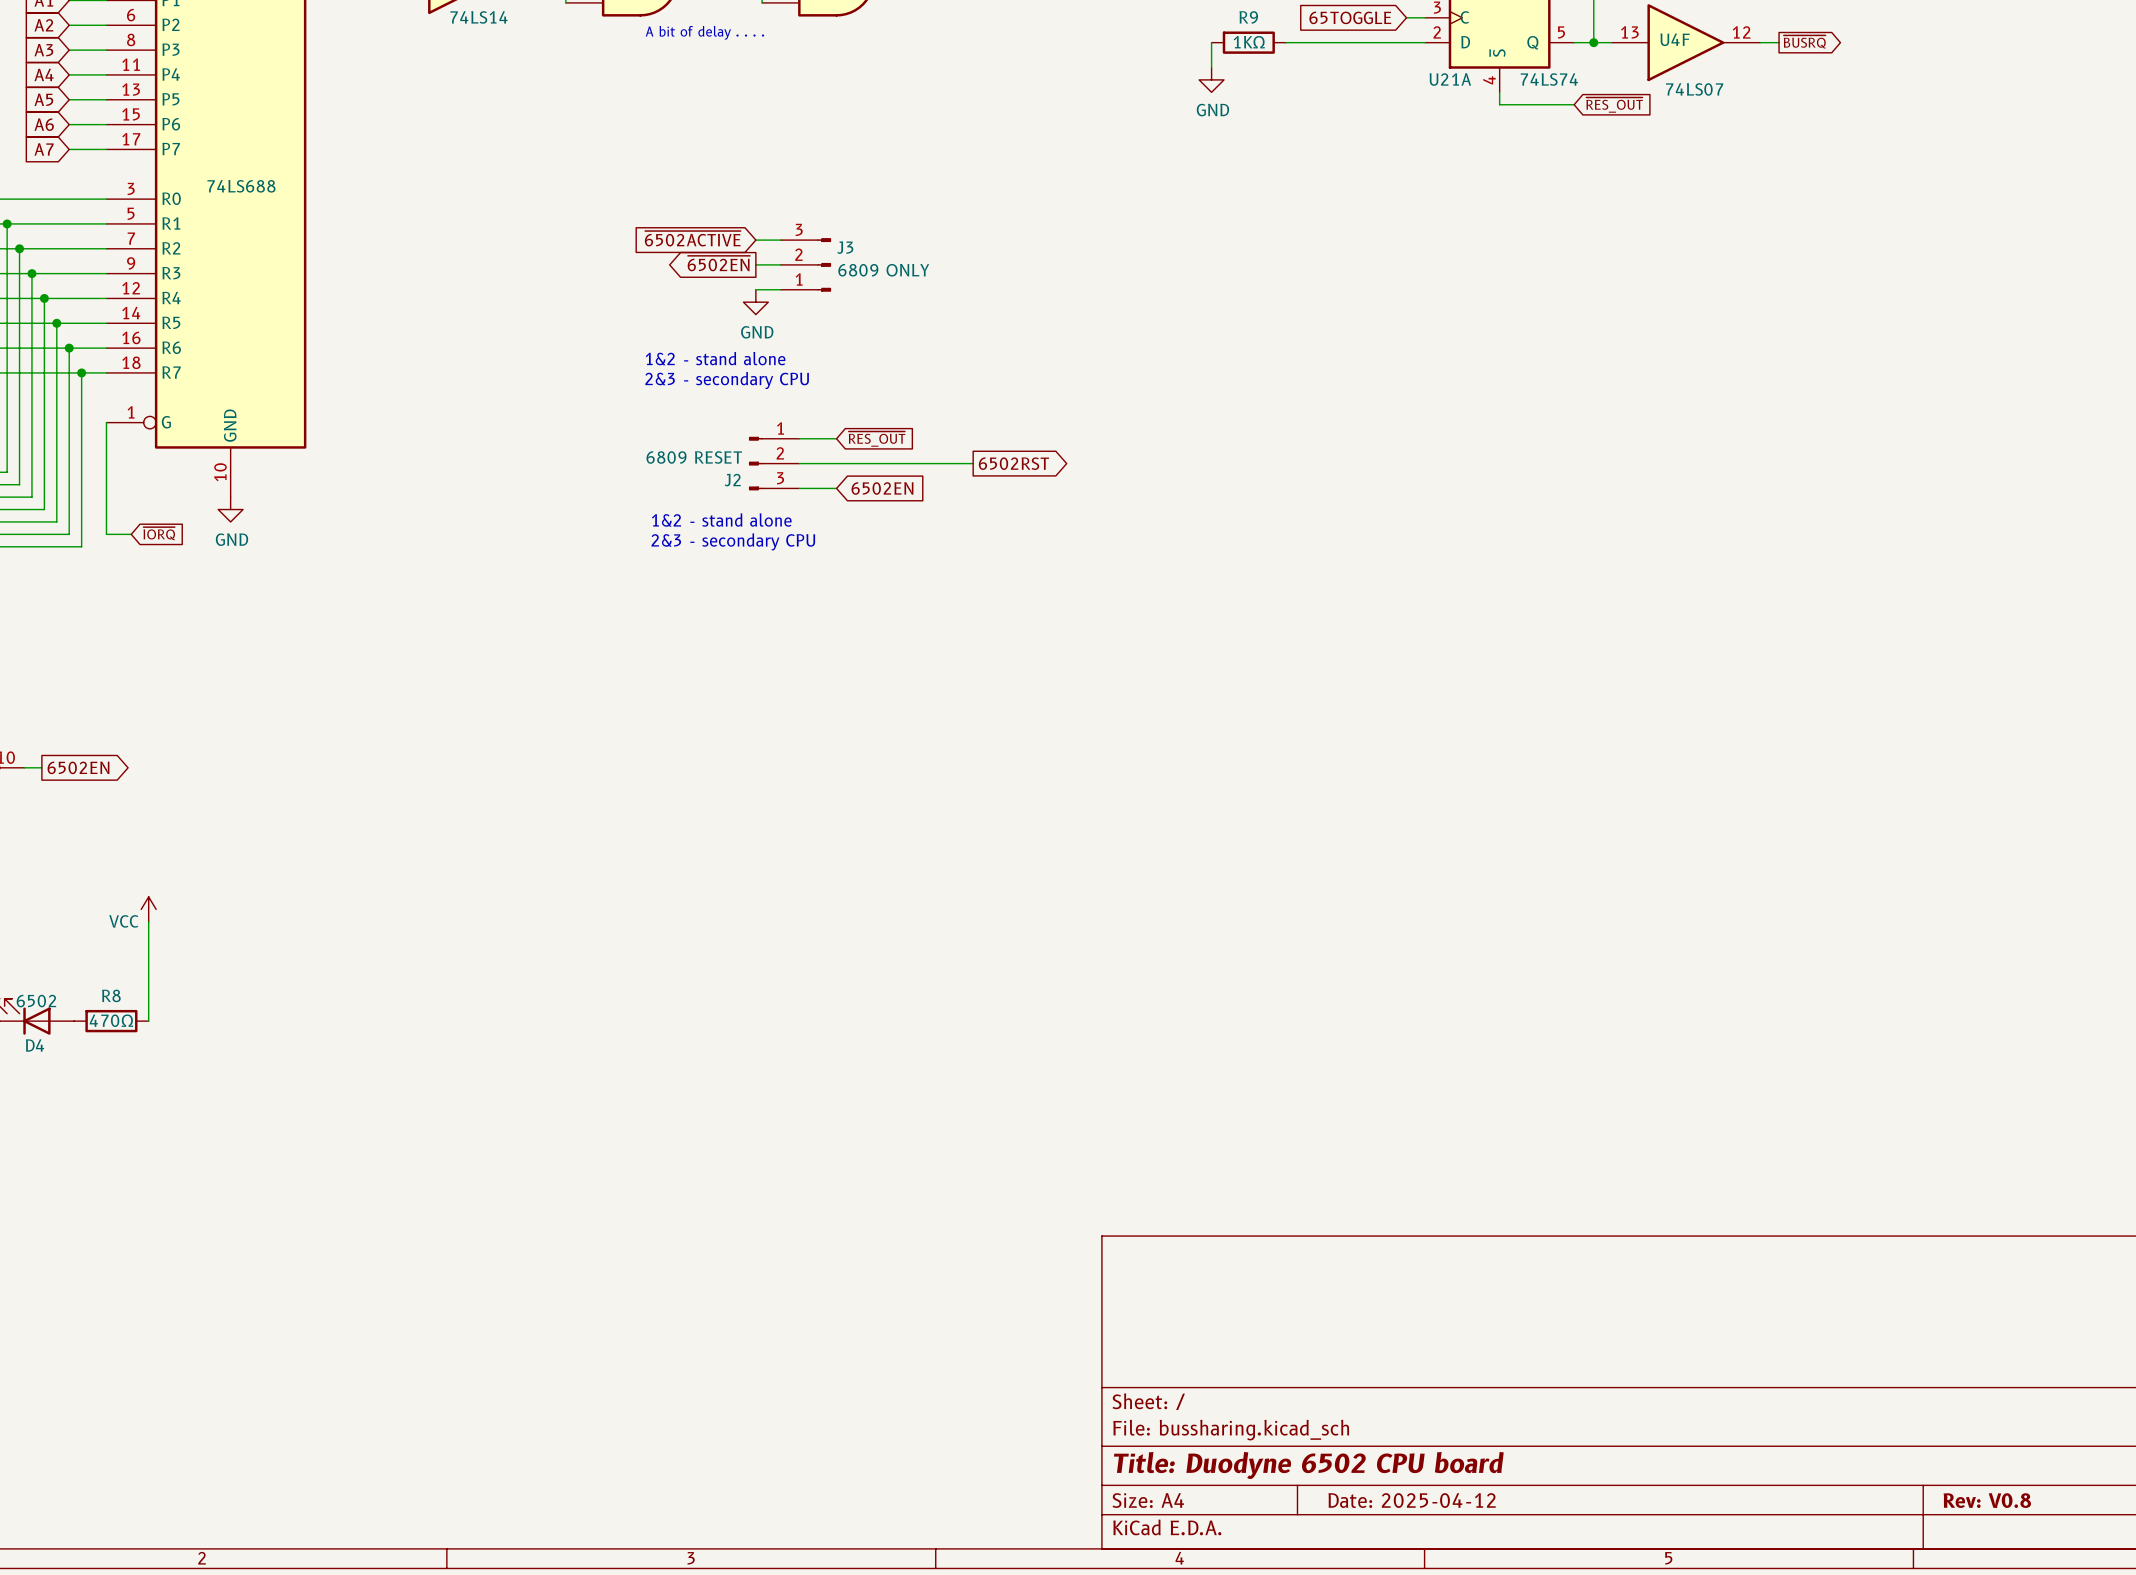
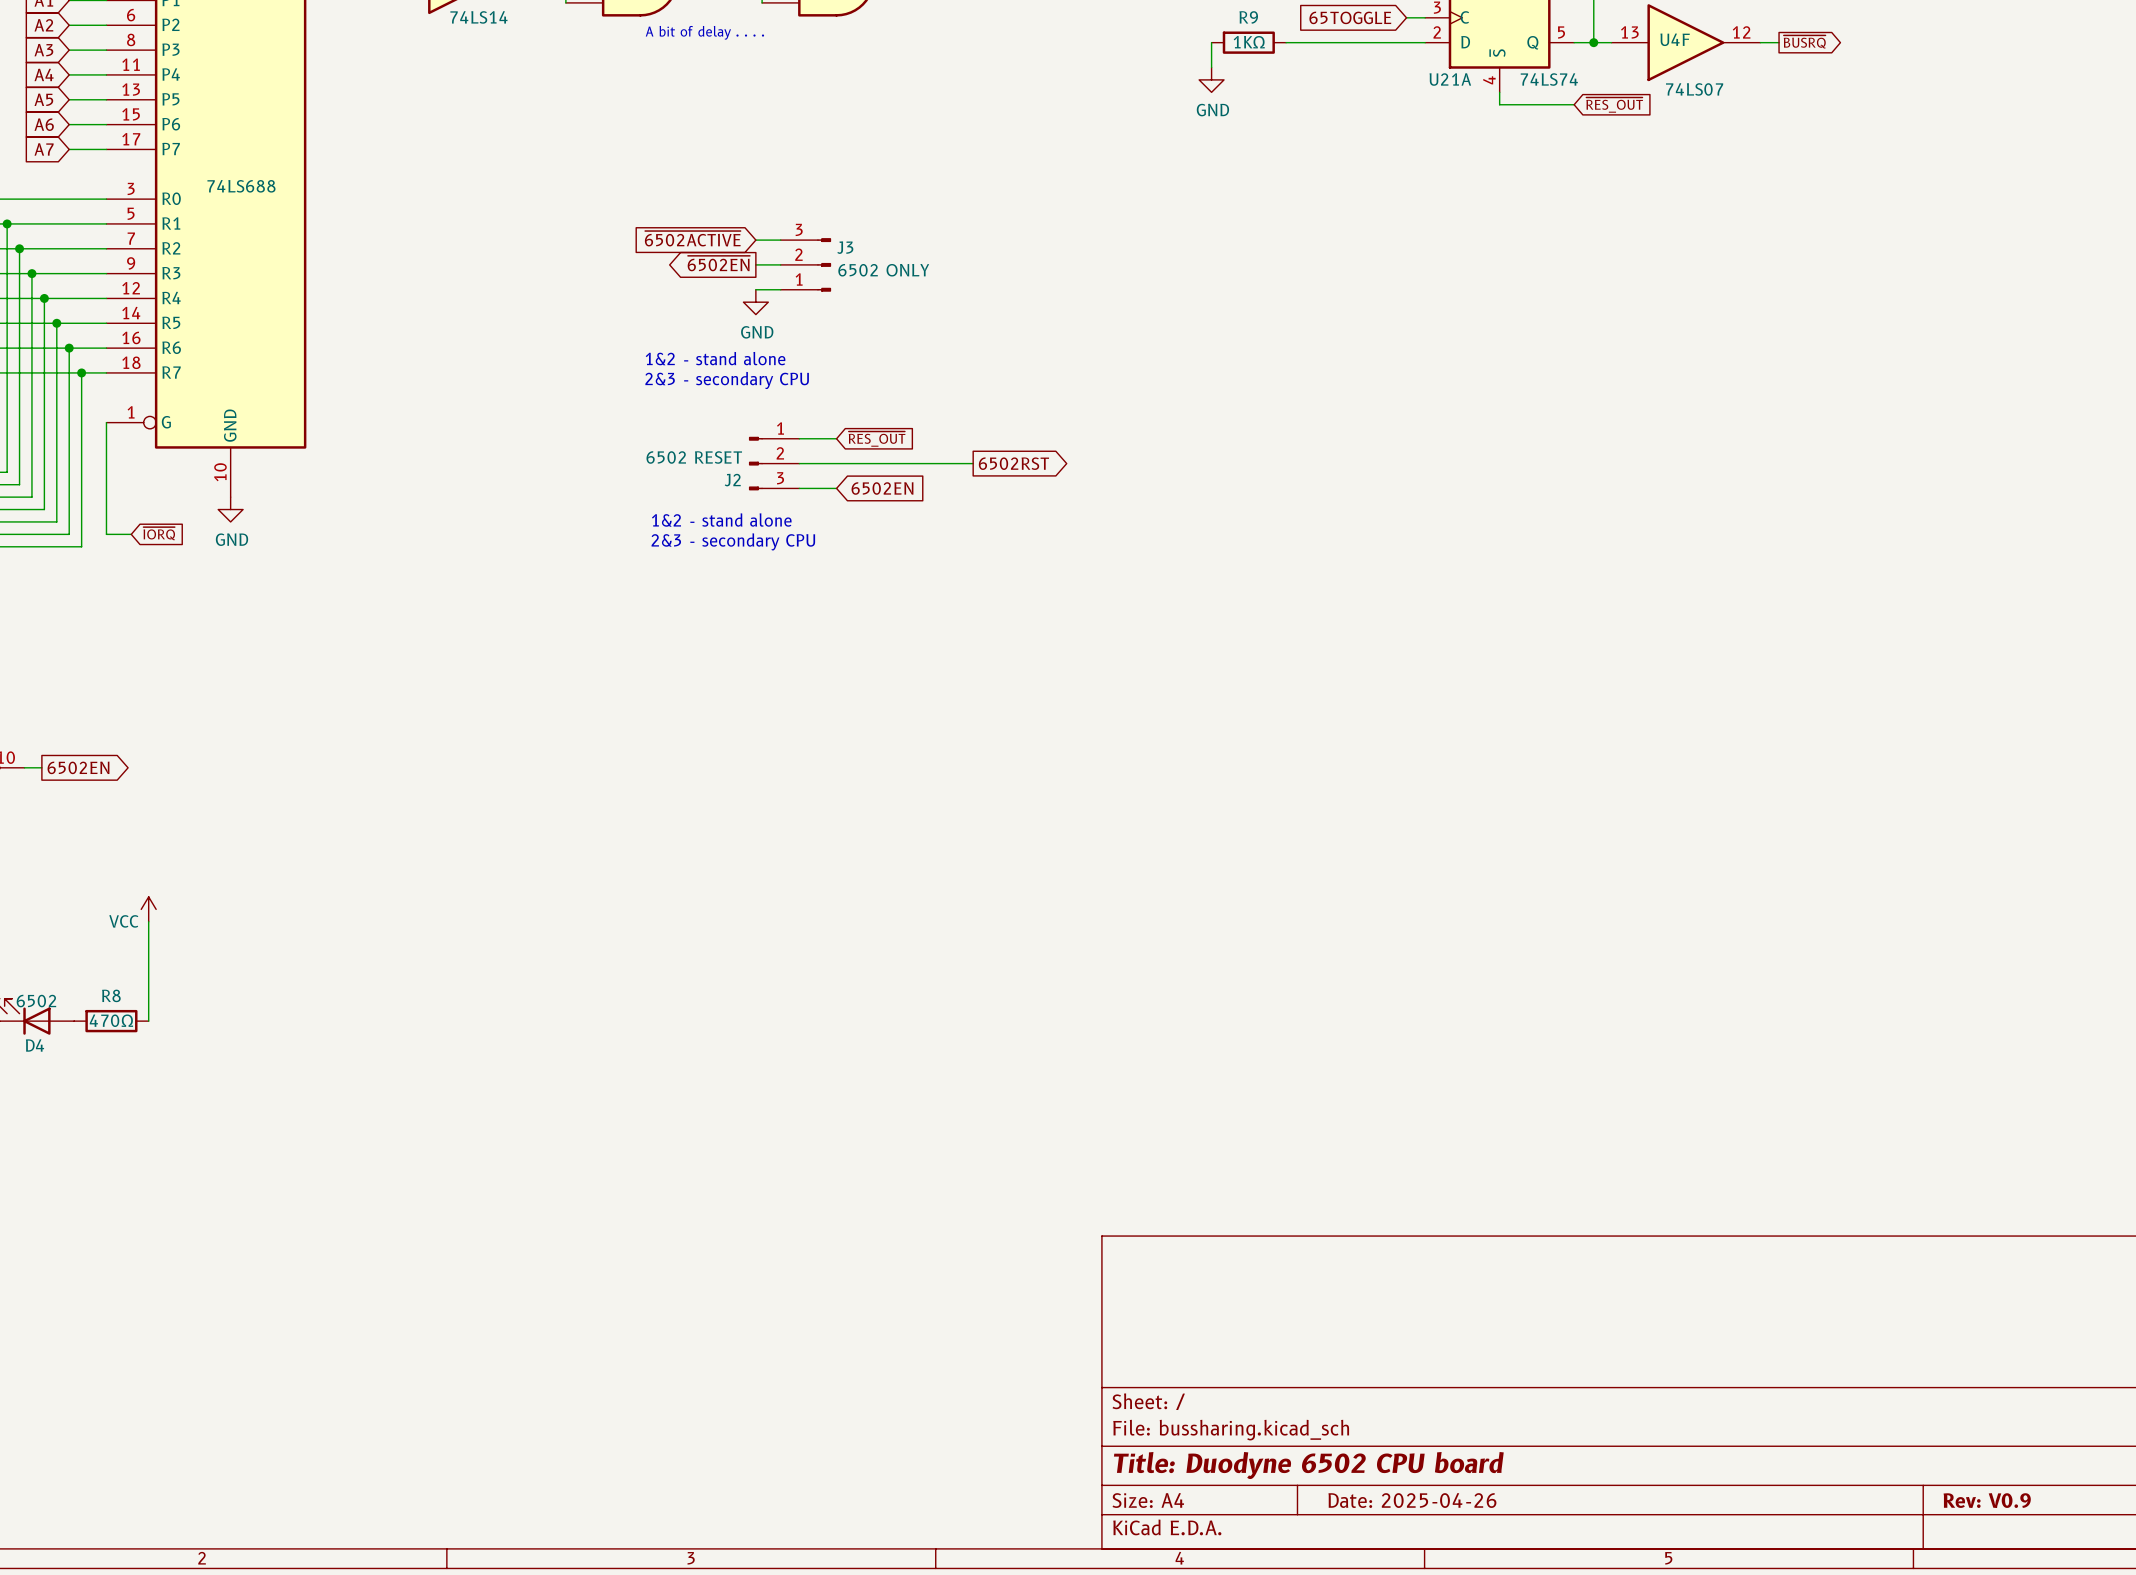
J3 value: 6809 ONLY (883, 270) -> 6502 ONLY (883, 270)
J2 value: 6809 RESET (694, 457) -> 6502 RESET (694, 457)
title block: Date: 2025-04-12 (1412, 1500) -> Date: 2025-04-26 (1412, 1500)
title block: Rev: V0.8 (1987, 1500) -> Rev: V0.9 (1987, 1500)

